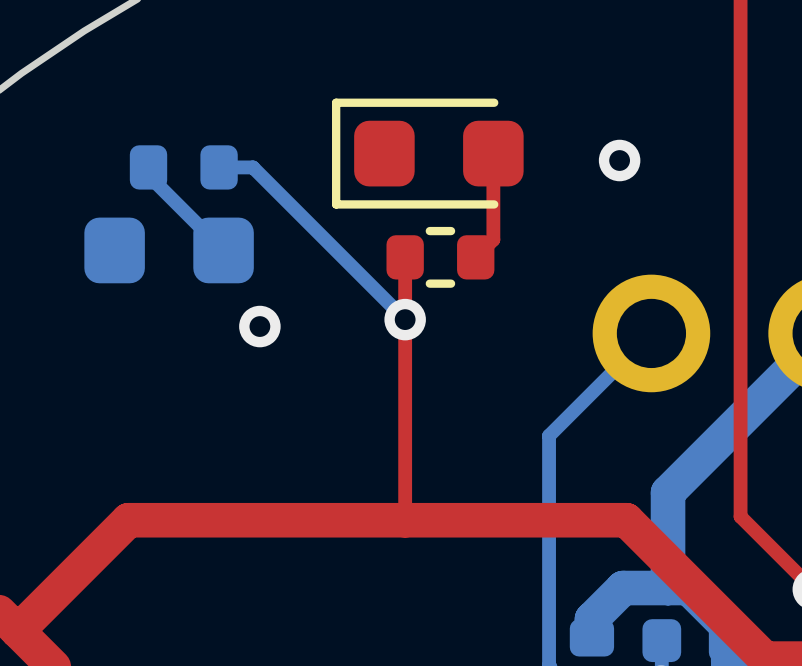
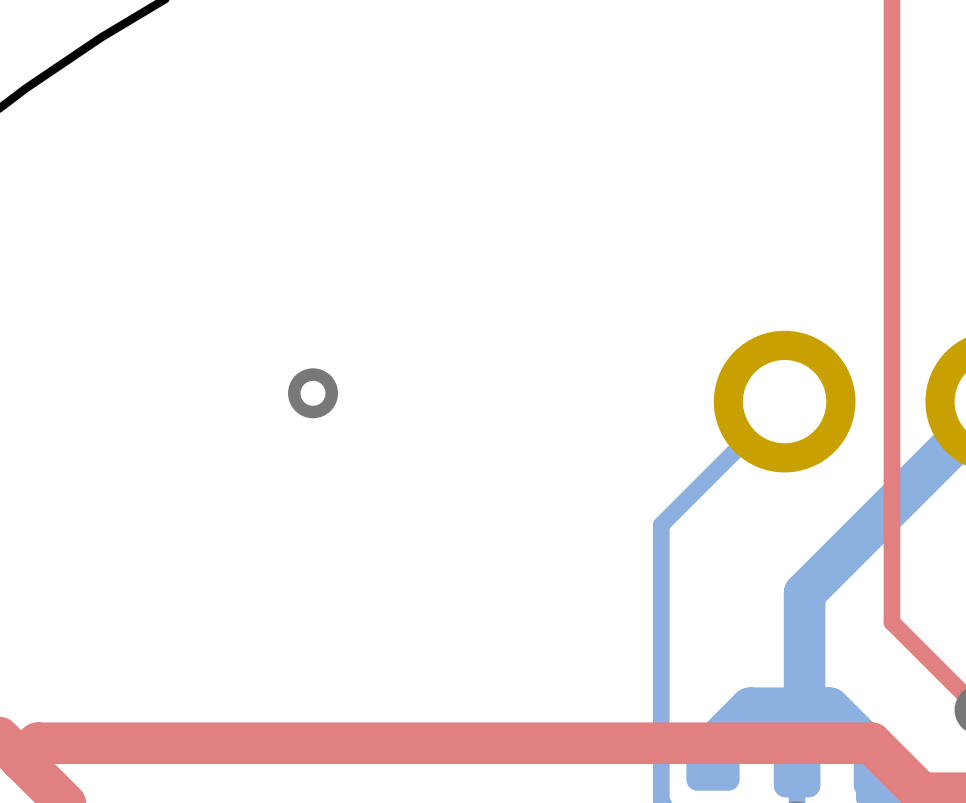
part: (427, 153) -> none
top track: (493, 153) (493, 239) (475, 257) -> none
via: (619, 160) -> none
bottom track: (148, 167) (148, 175) (223, 250) -> none
part: (183, 167) -> none
bottom track: (219, 167) (252, 167) (405, 319) -> none
part: (169, 250) -> none
top track: (405, 257) (405, 520) -> none
part: (440, 257) -> none
via: (405, 319) -> none
top track: (31, 617) (128, 520) (626, 520) (723, 617) -> (38, 743) (871, 743)

